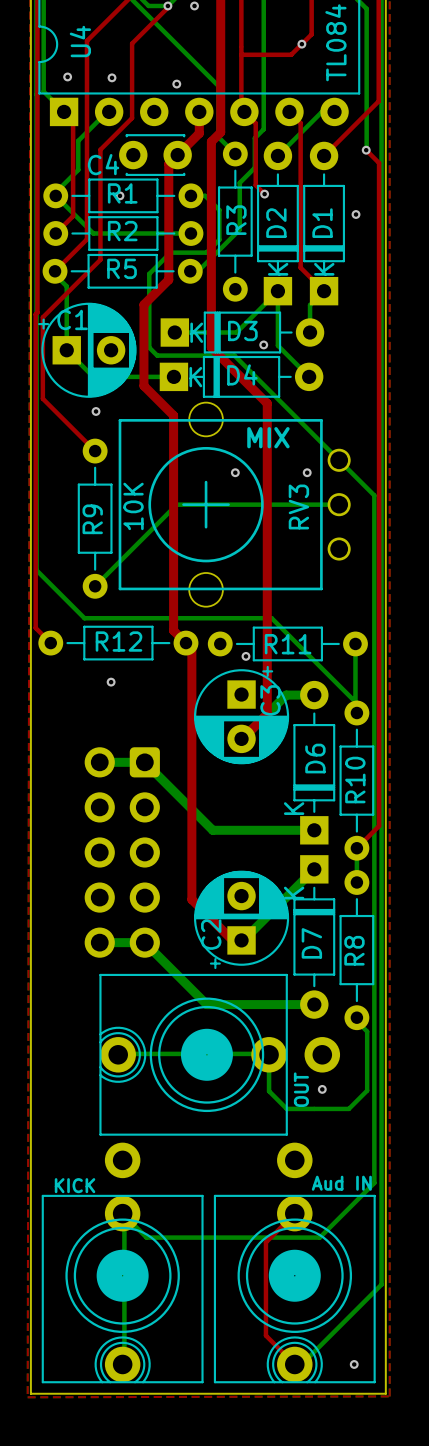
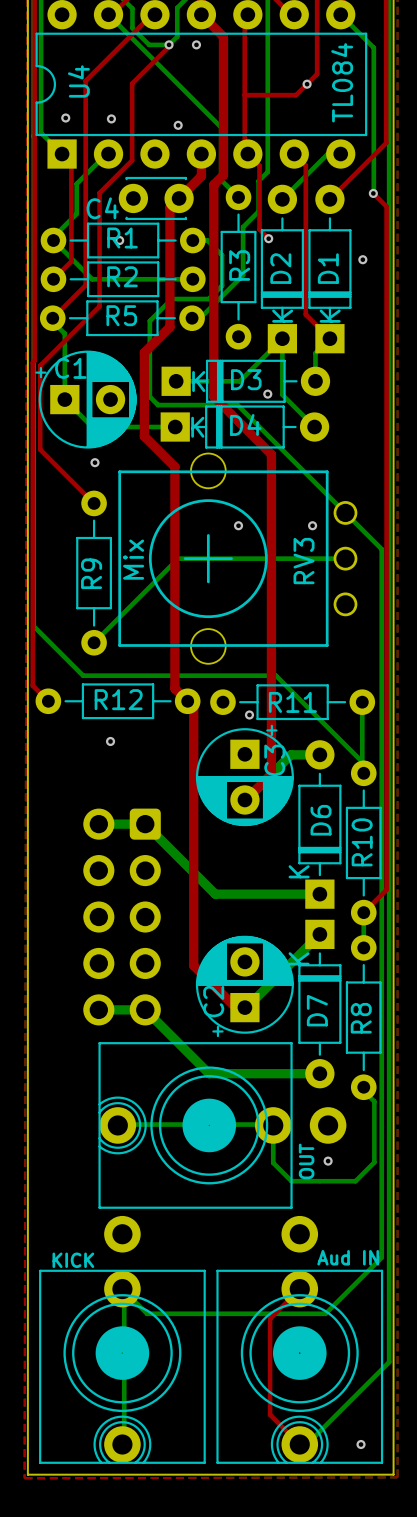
text: MIX (268, 437) -> none
RV3 value: 10K (133, 506) -> Mix (133, 559)

